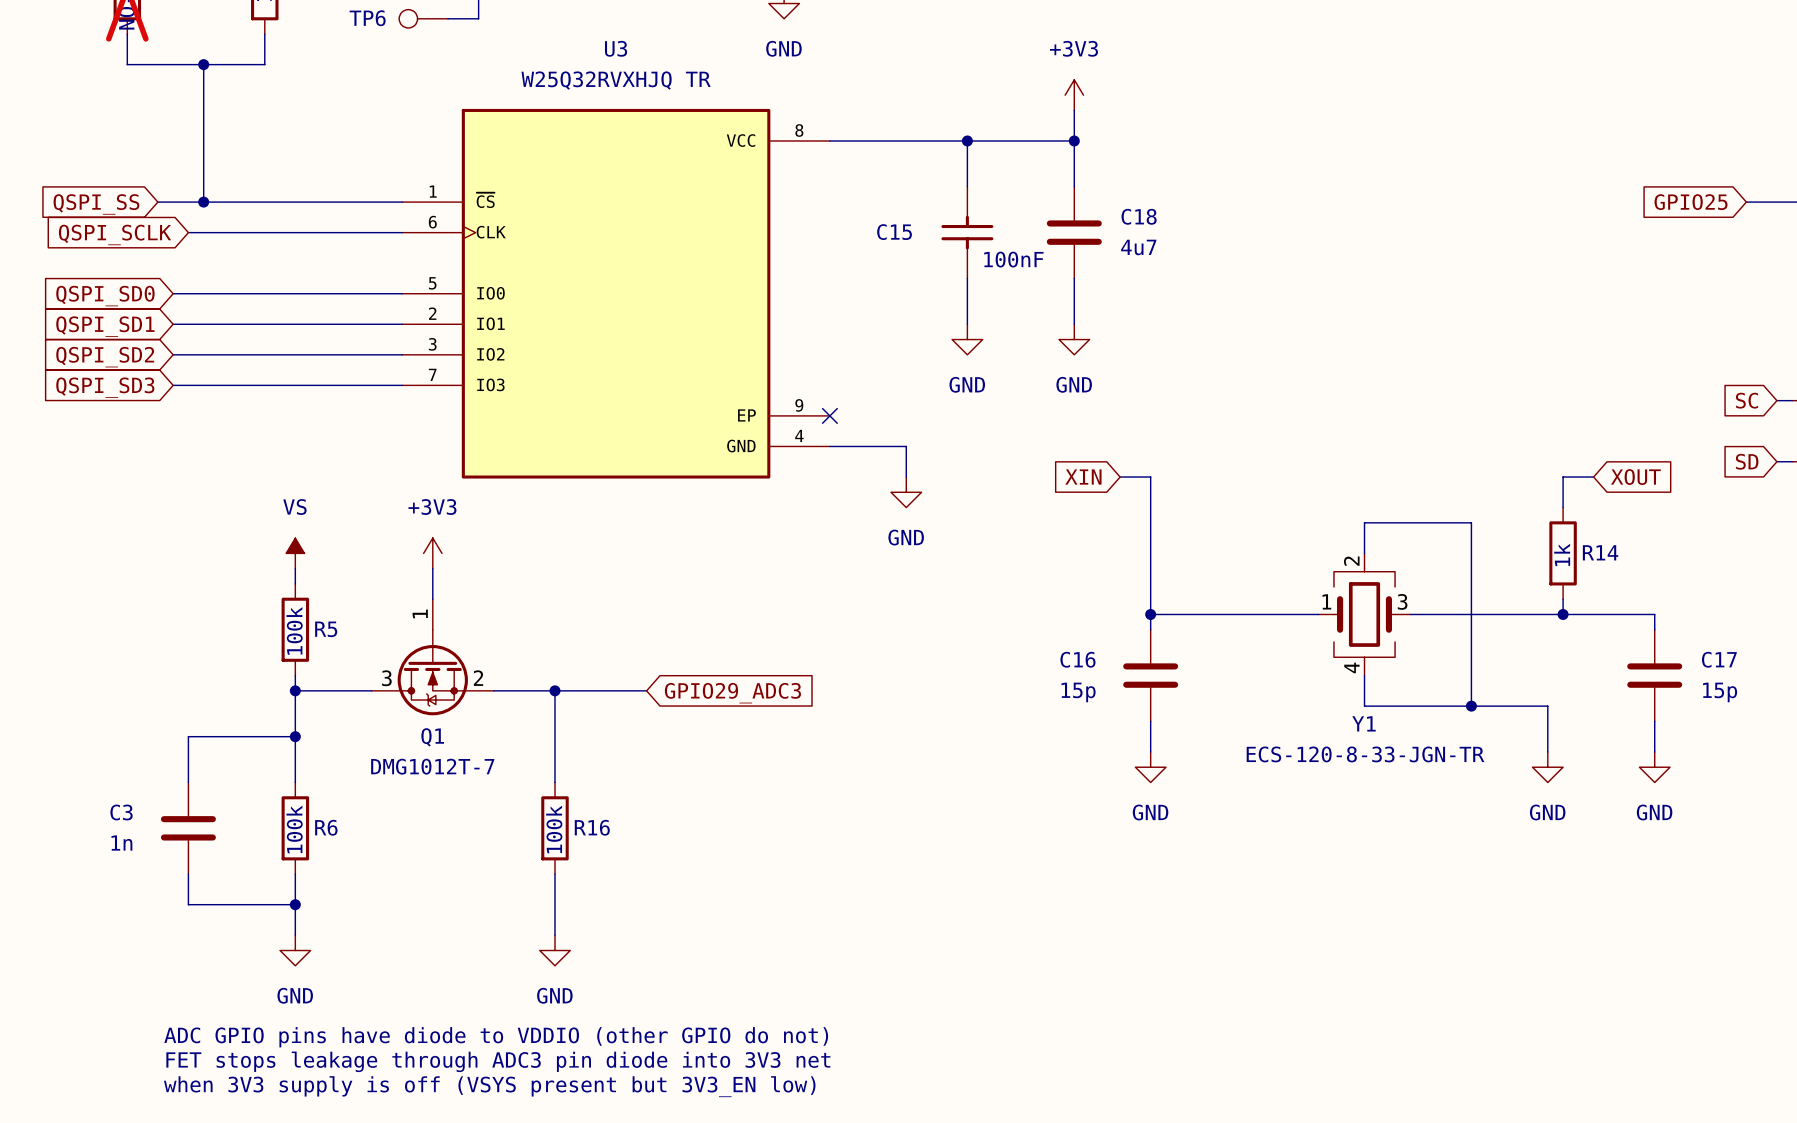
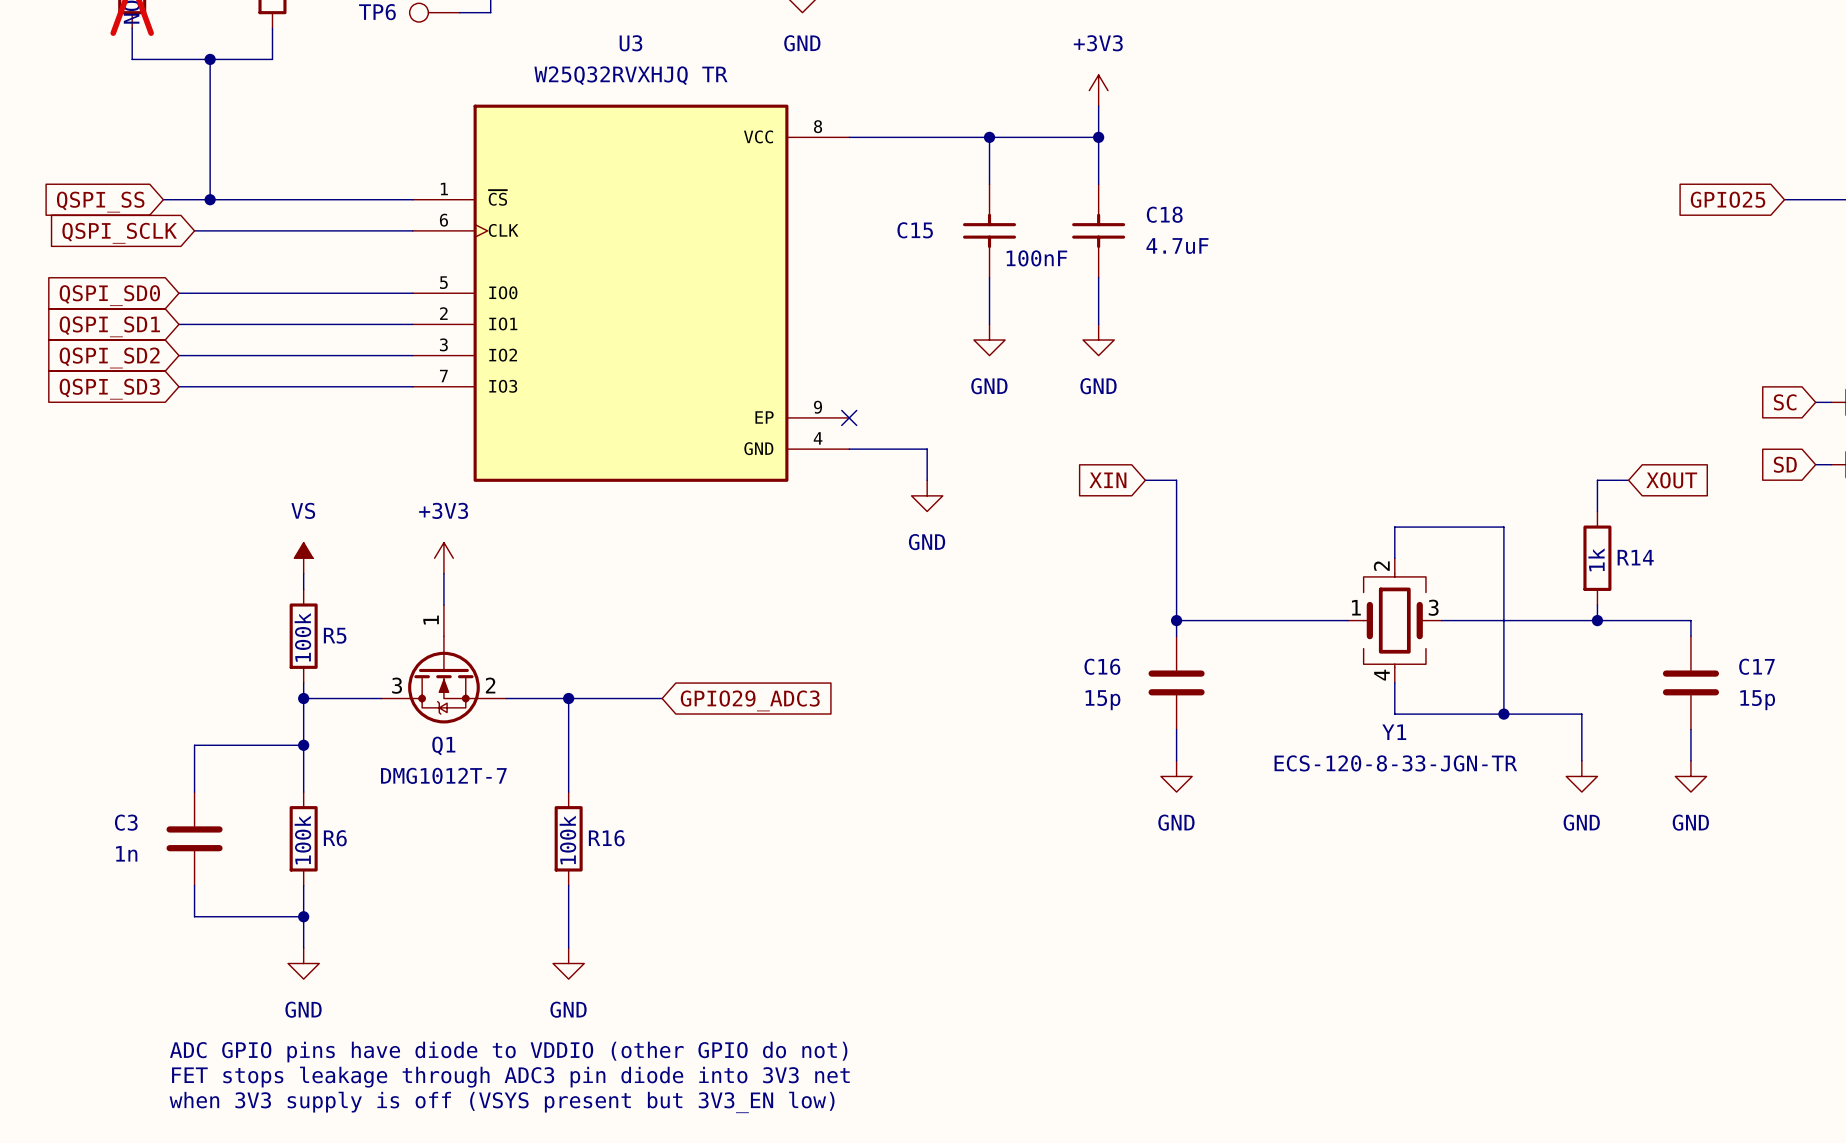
C18 symbol: [1046, 186, 1102, 279] -> [1072, 184, 1126, 278]
C18 value: 4u7 (1138, 247) -> none
C18 text: none -> 4.7uF (1177, 246)

